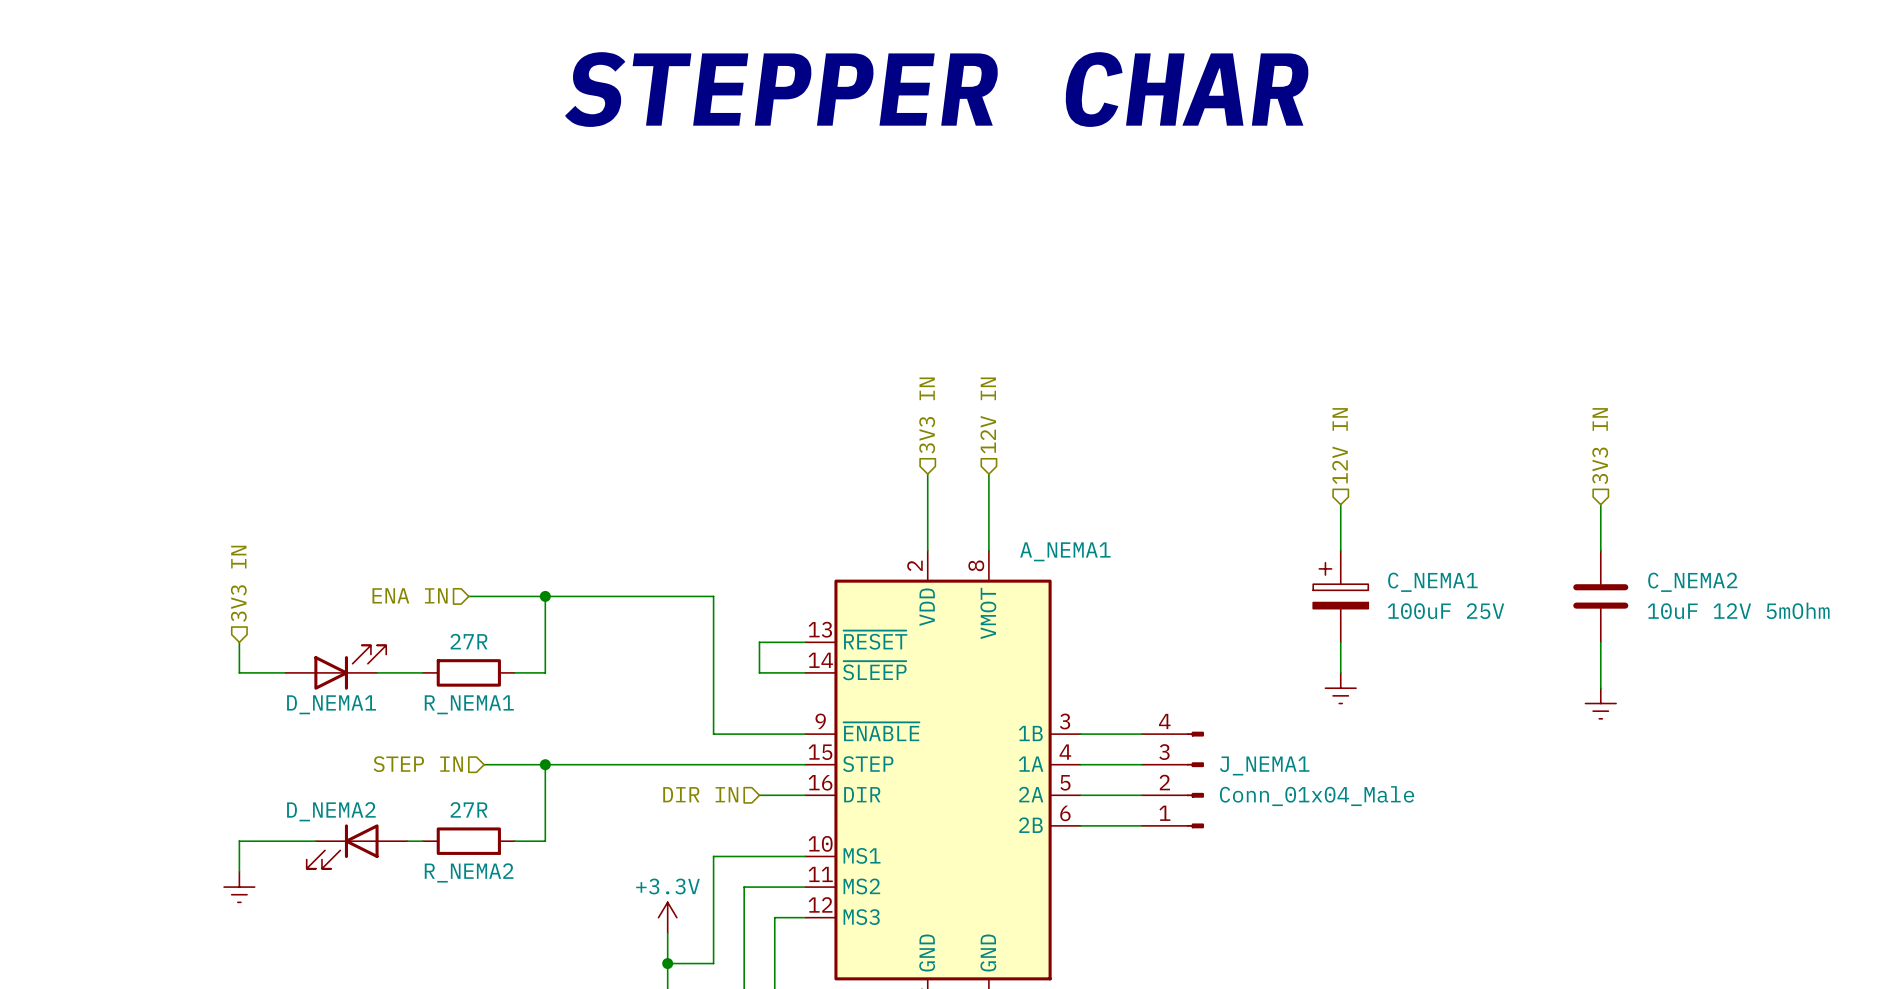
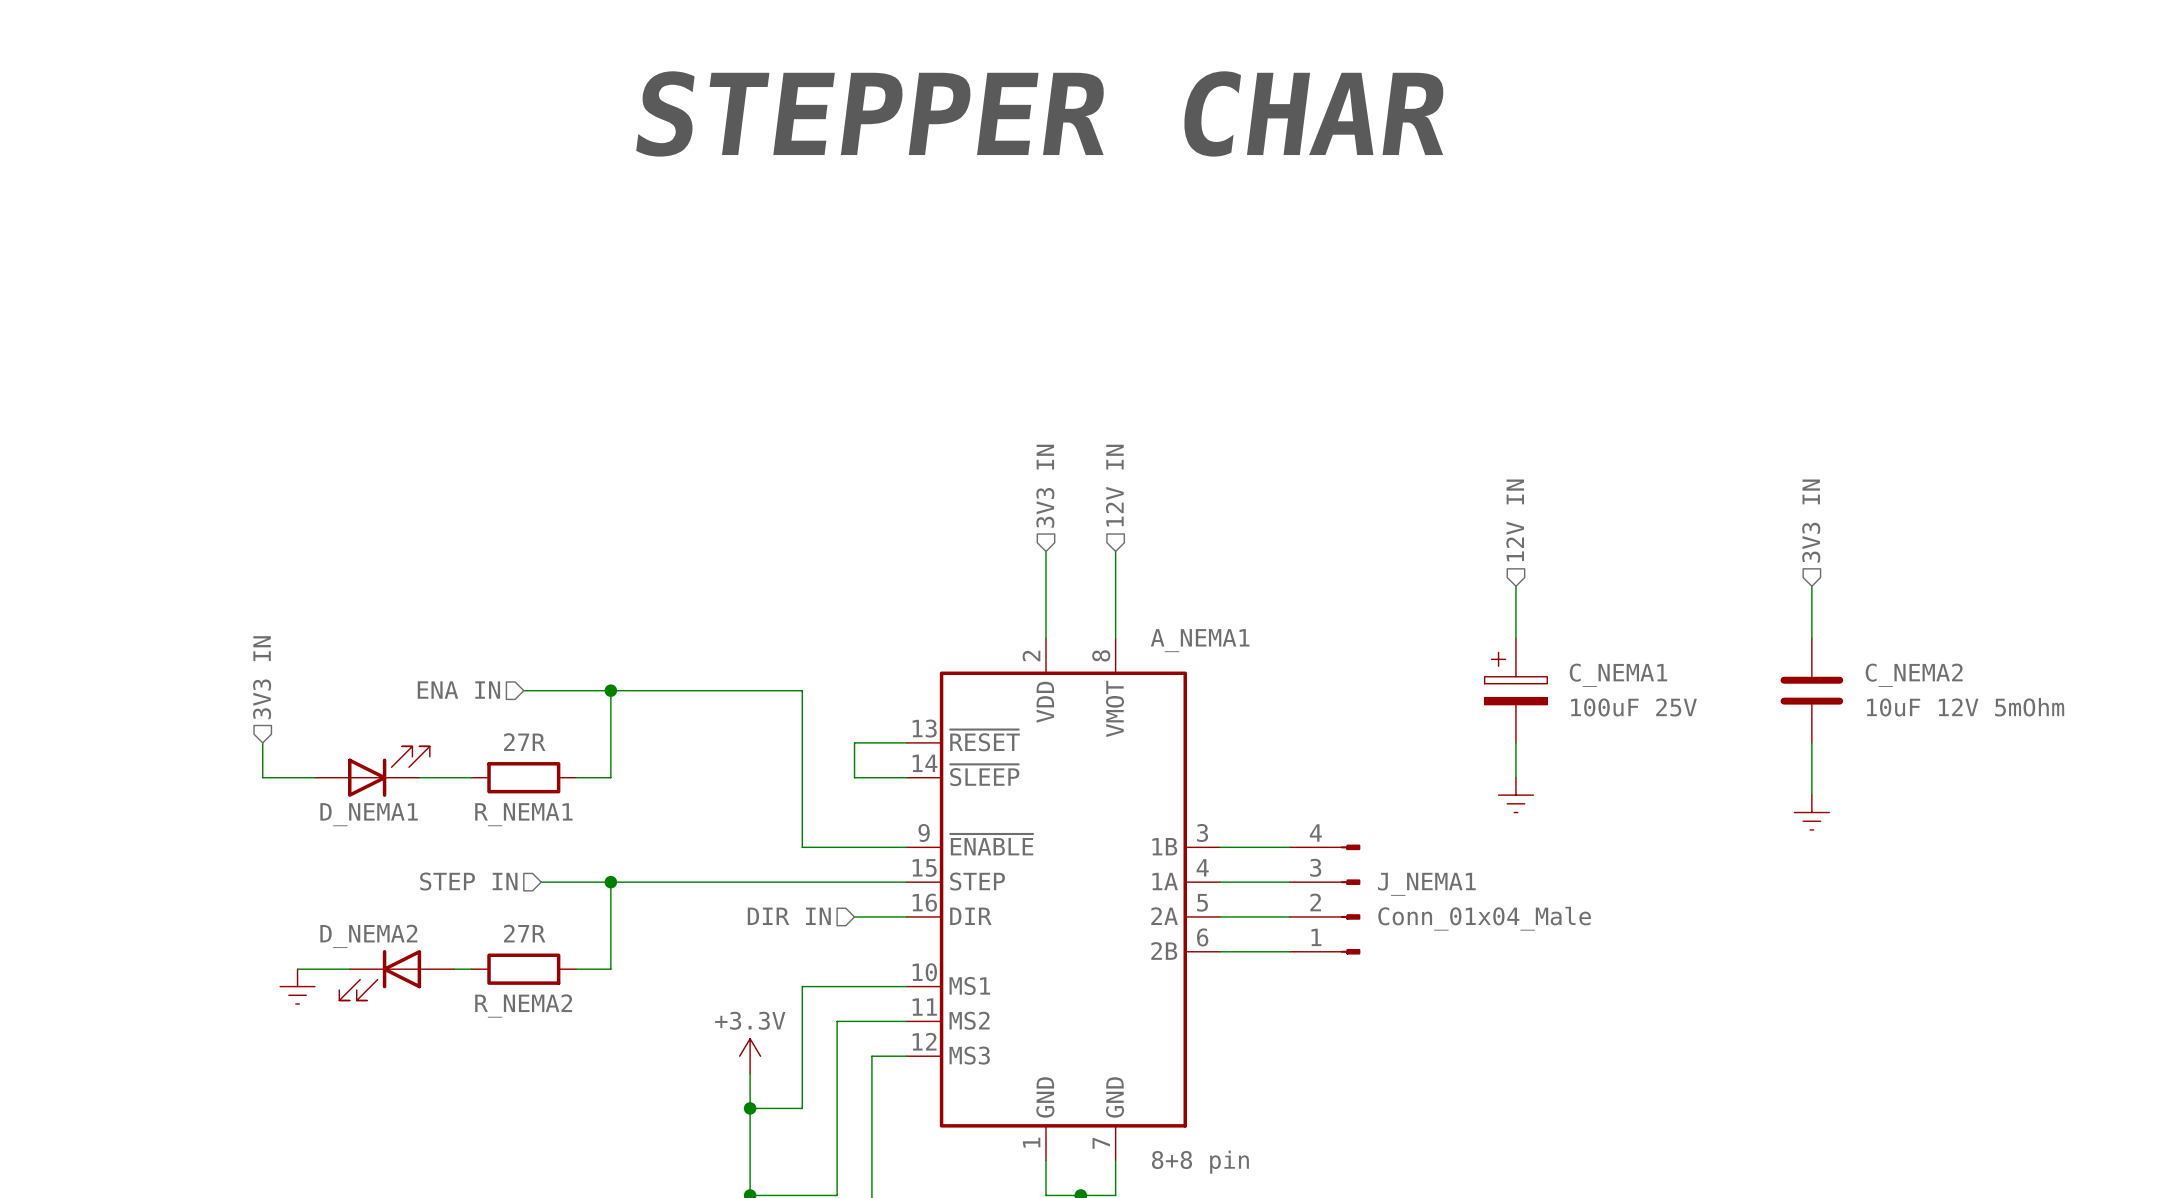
wire: (269, 841) (239, 841) (239, 871) -> none
power symbol position: (239, 887) -> (297, 986)

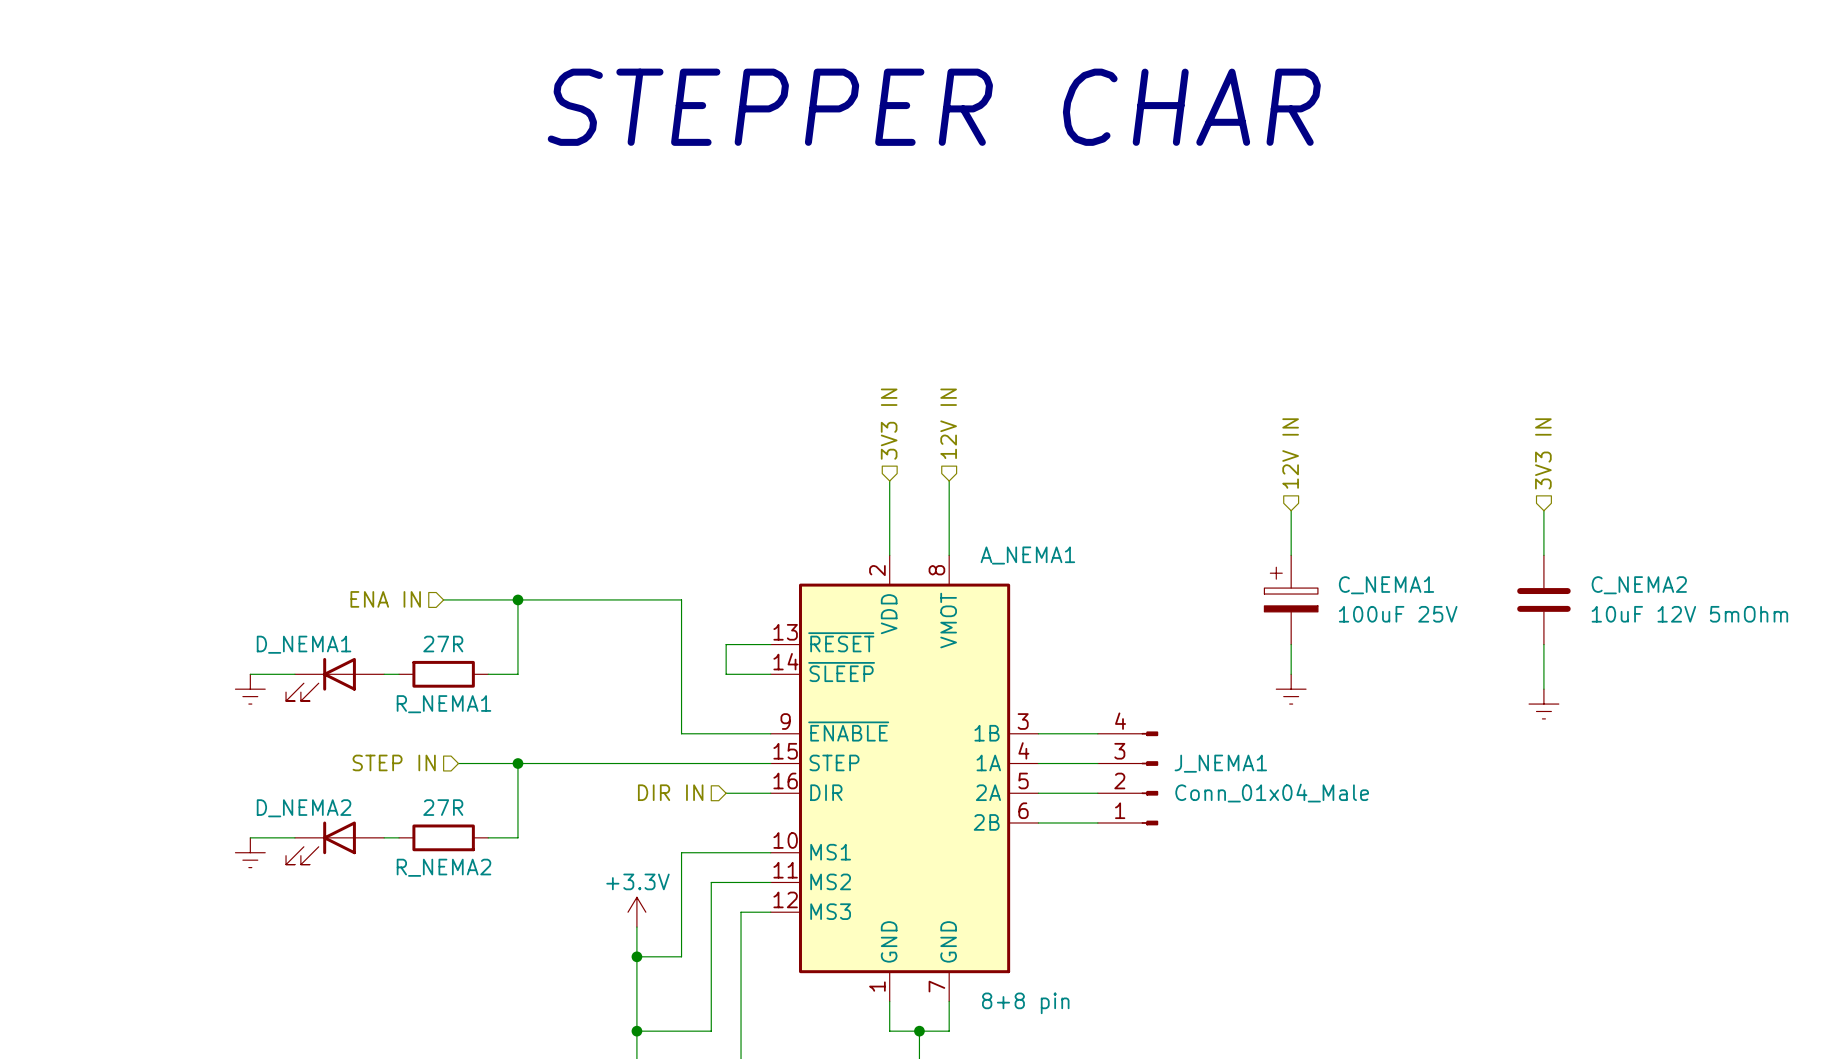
hierarchical label: 3V3 IN (262, 677) -> none
wire: (262, 742) (262, 777) (297, 777) -> none
D_NEMA1 rotation: 0° (388, 771) -> 180° (320, 679)
power symbol: none -> (250, 689)
D_NEMA1 name position: D_NEMA1 (369, 814) -> D_NEMA1 (304, 644)

